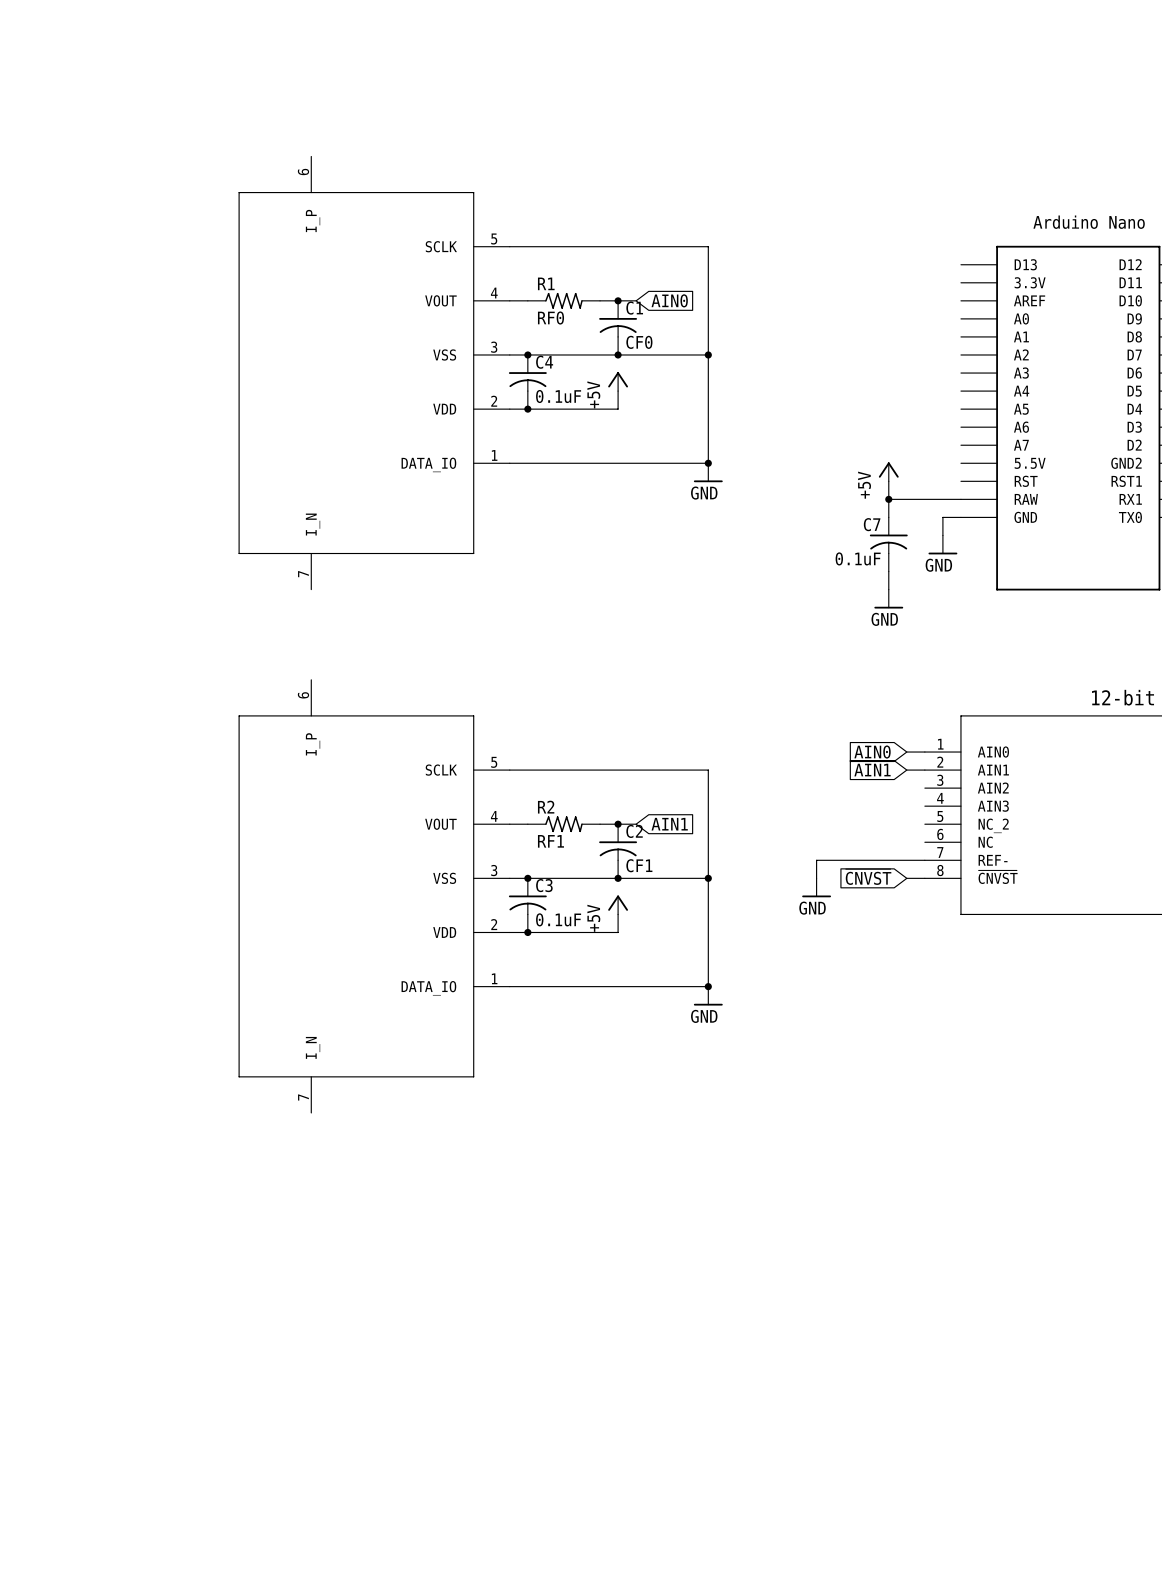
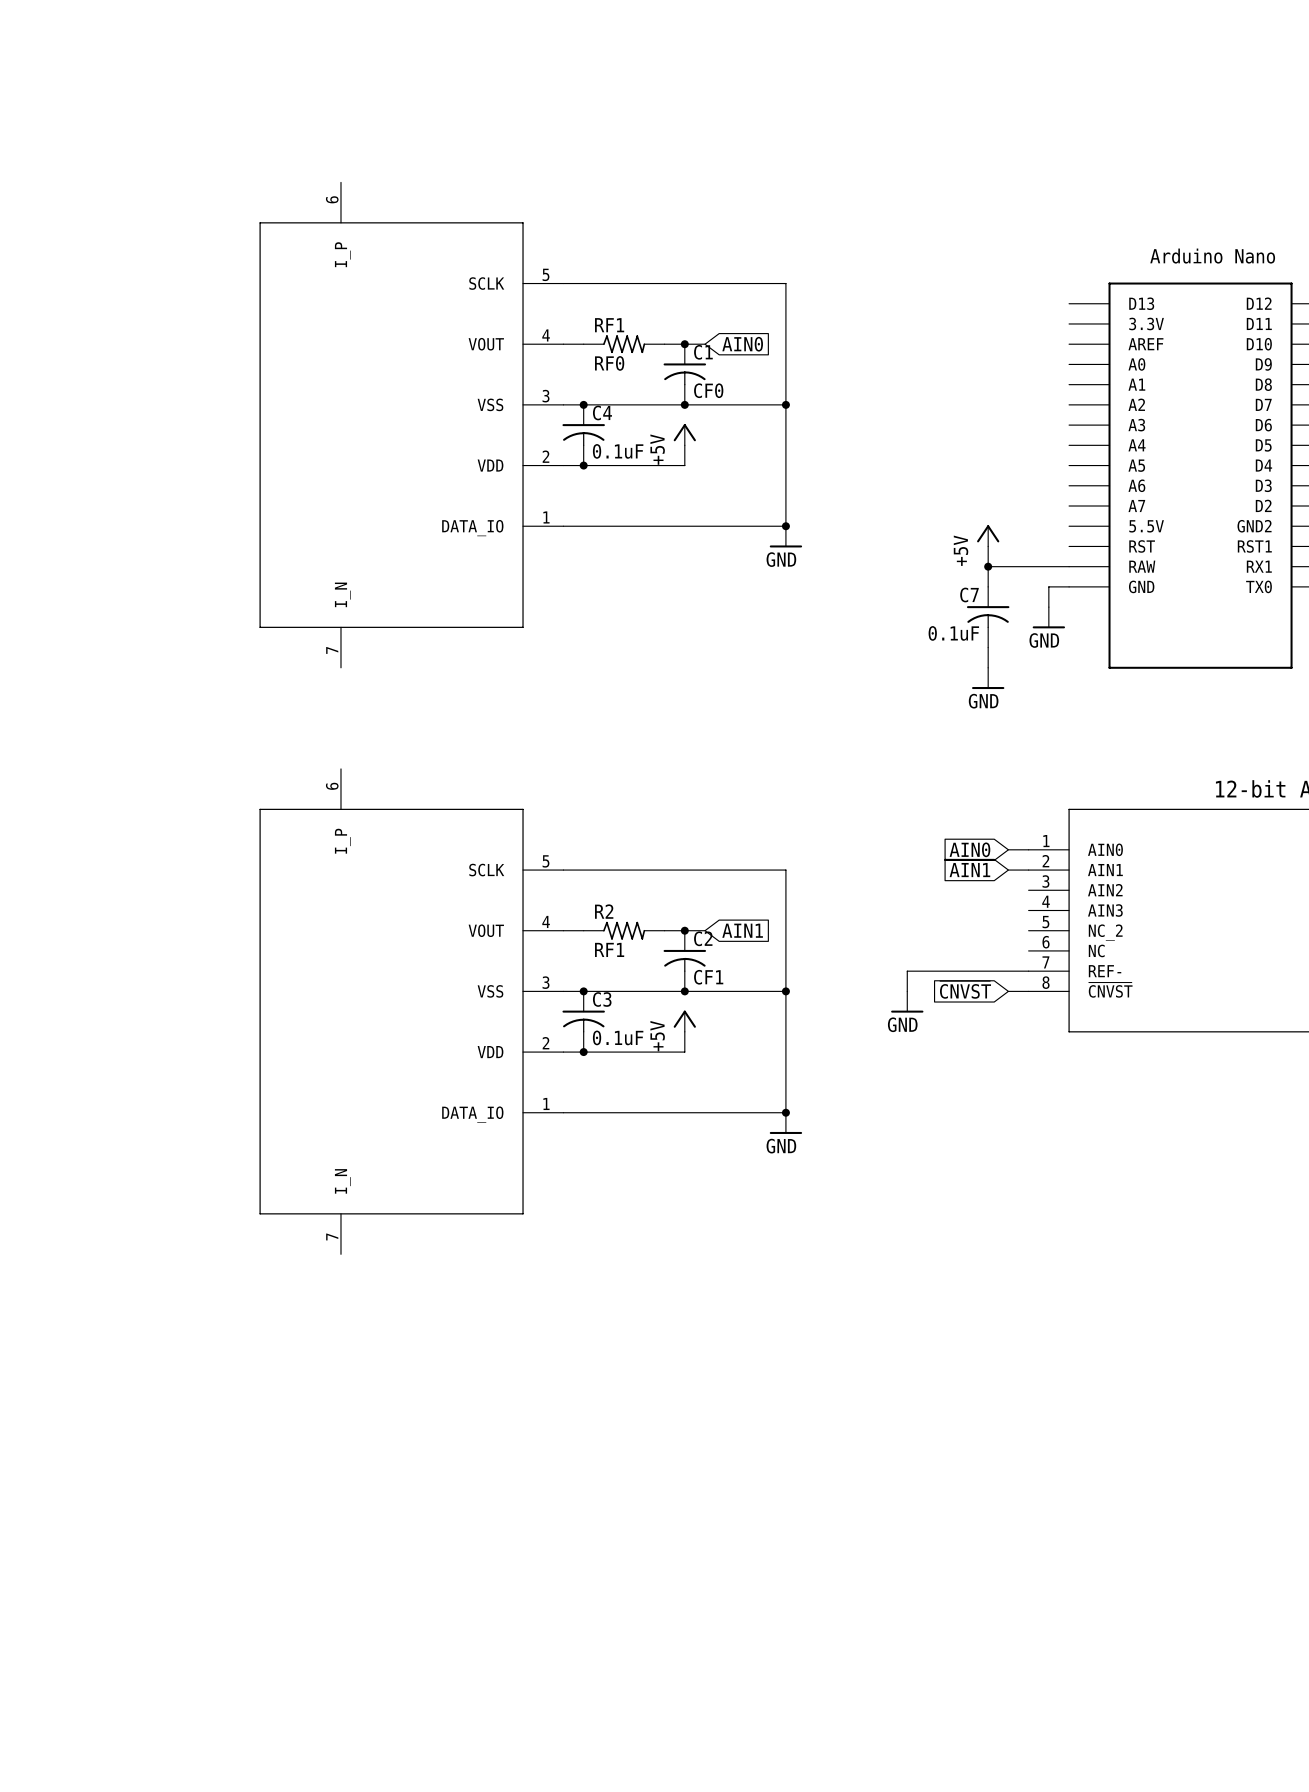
R1 name: R1 (546, 283) -> RF1 (609, 325)

